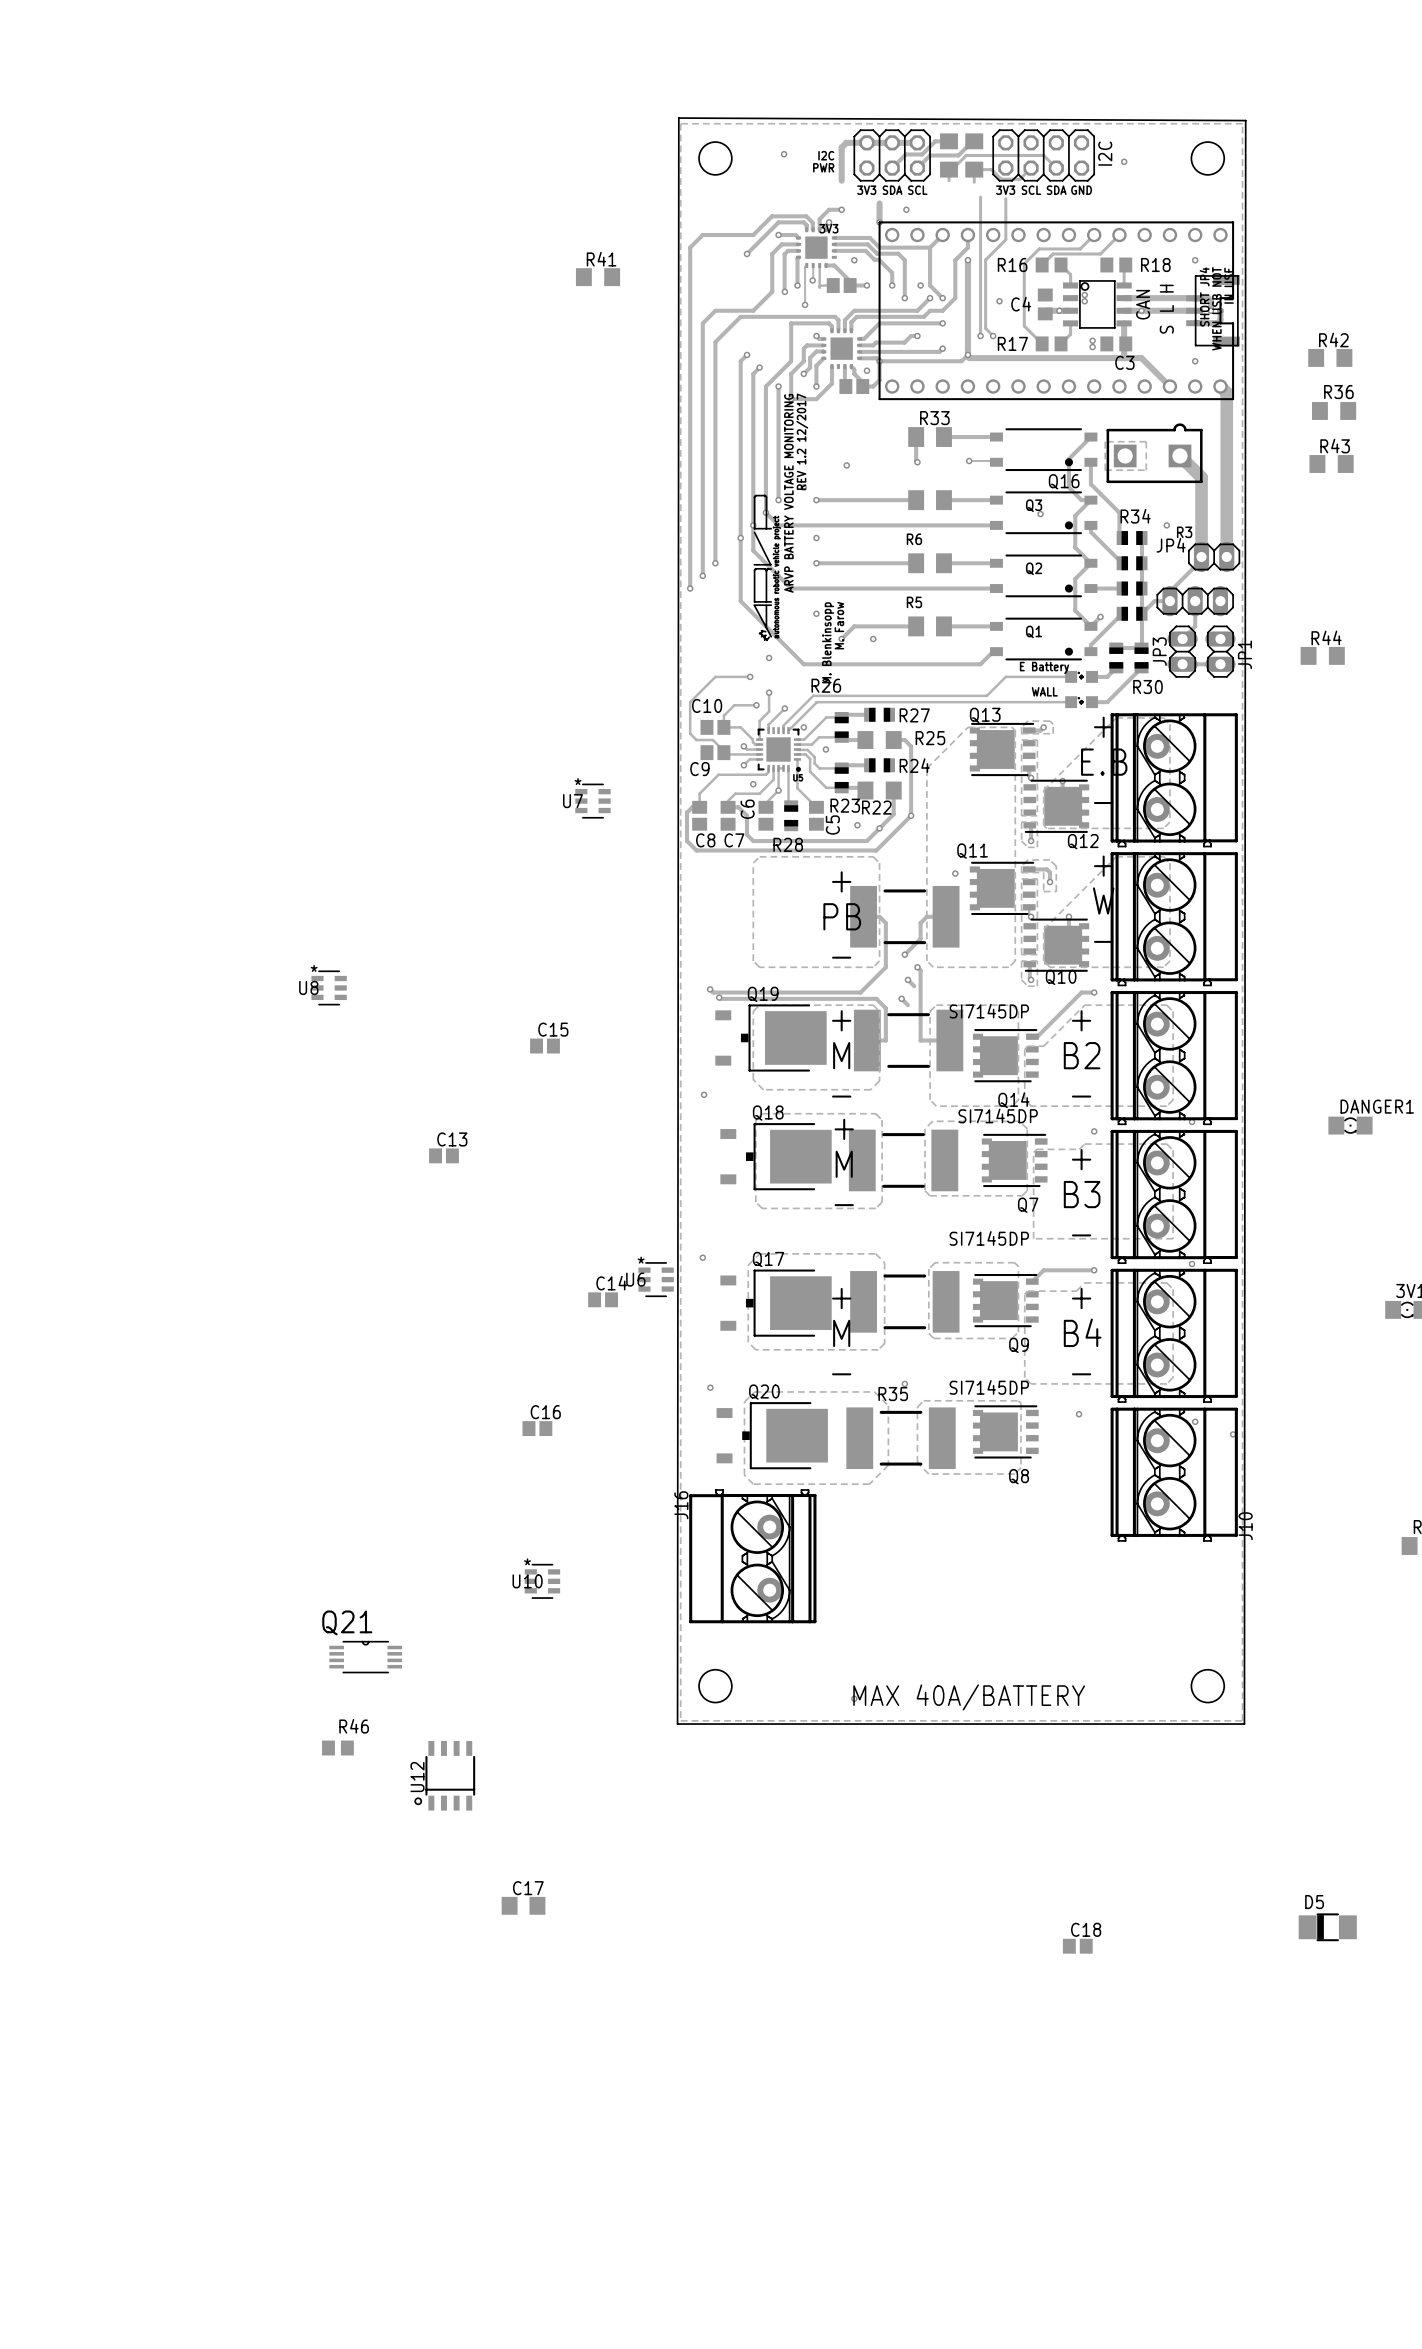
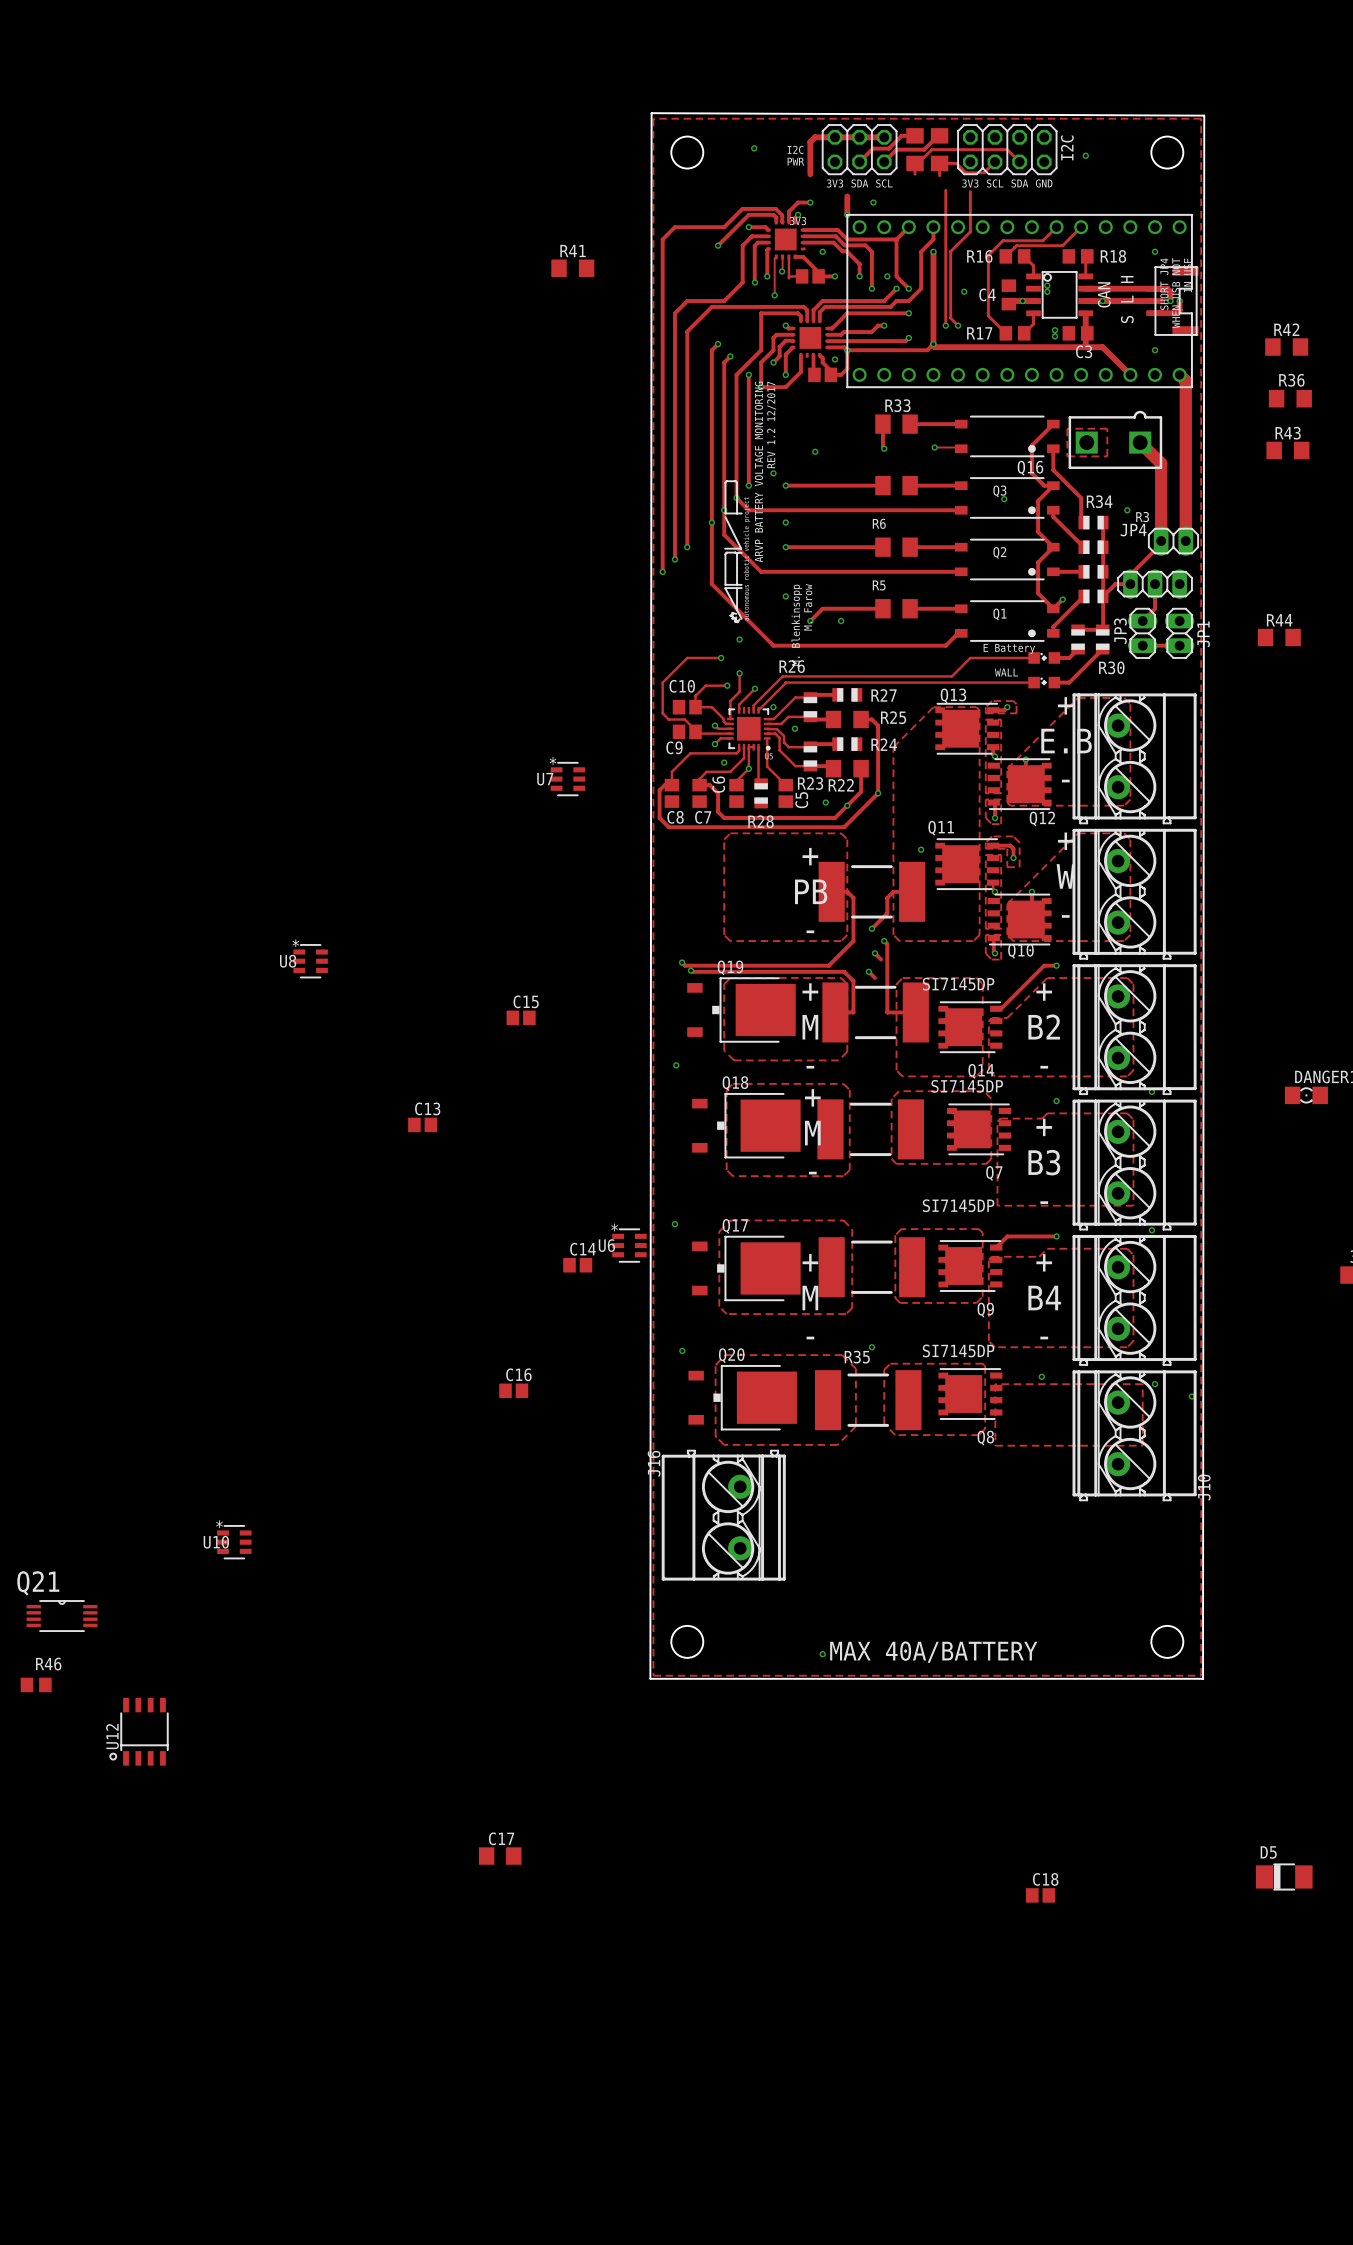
zone outline: none -> (995, 1384) (995, 1445) (1142, 1445) (1142, 1384) (995, 1384)
U10 position: (542, 1581) -> (234, 1542)
Q21 position: (365, 1657) -> (62, 1616)
R46 position: (337, 1748) -> (36, 1684)
U12 position: (444, 1775) -> (139, 1731)

